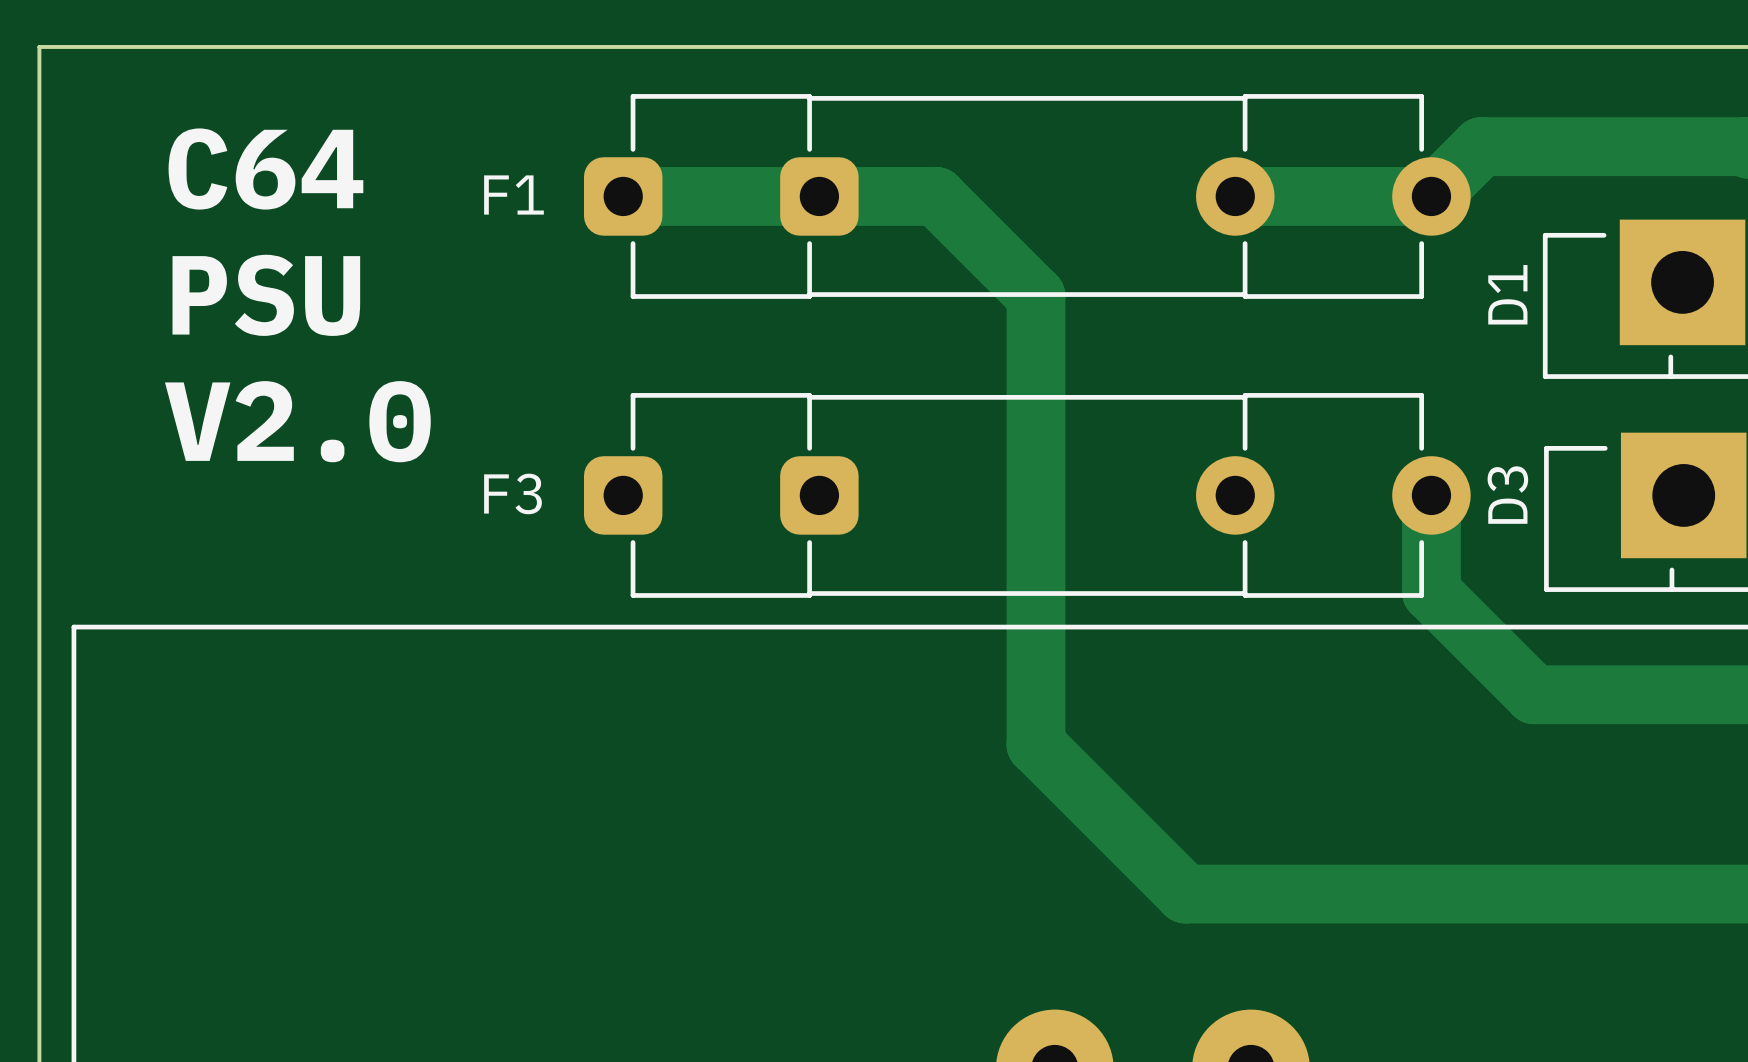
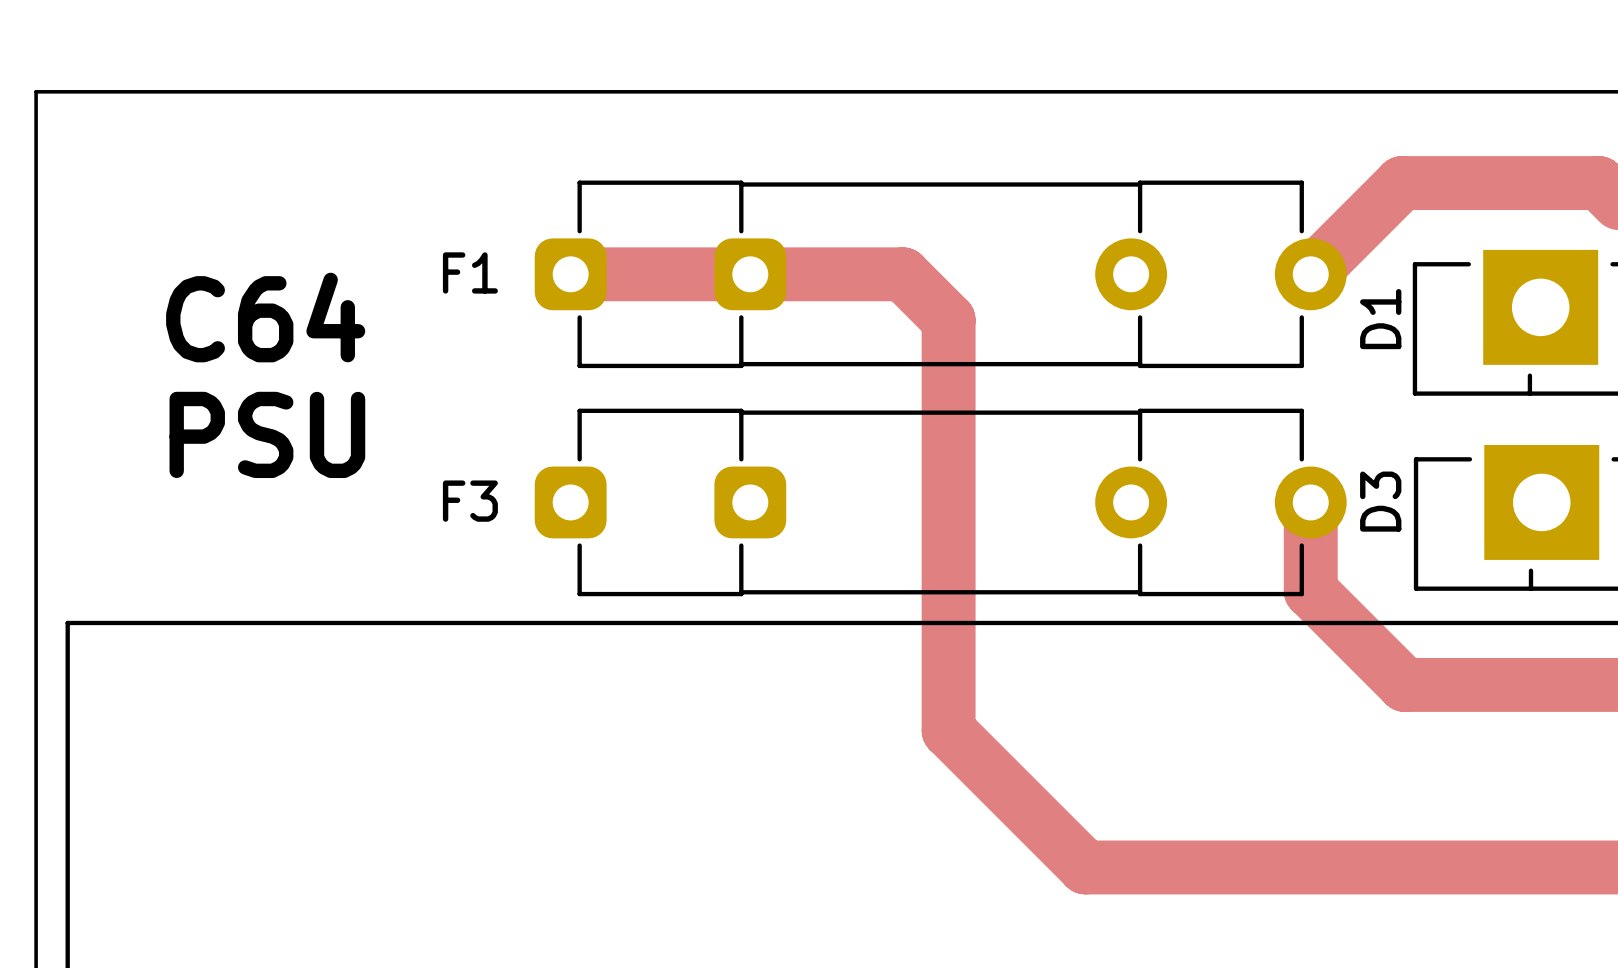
track: (1531, 146) (1481, 146) (1431, 196) (1235, 196) -> (1402, 183) (1310, 274)
text: C64 (265, 169) -> none
track: (623, 196) (936, 196) (986, 246) -> (570, 274) (902, 274)
F1 position: (1027, 196) -> (940, 274)
text: PSU (266, 295) -> C64 (265, 317)
text: V2.0 (297, 421) -> PSU (267, 434)

